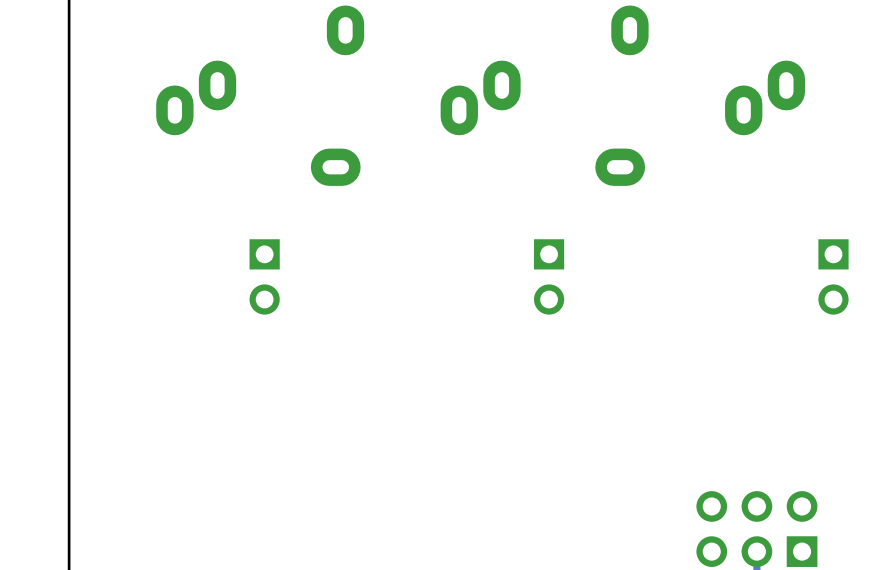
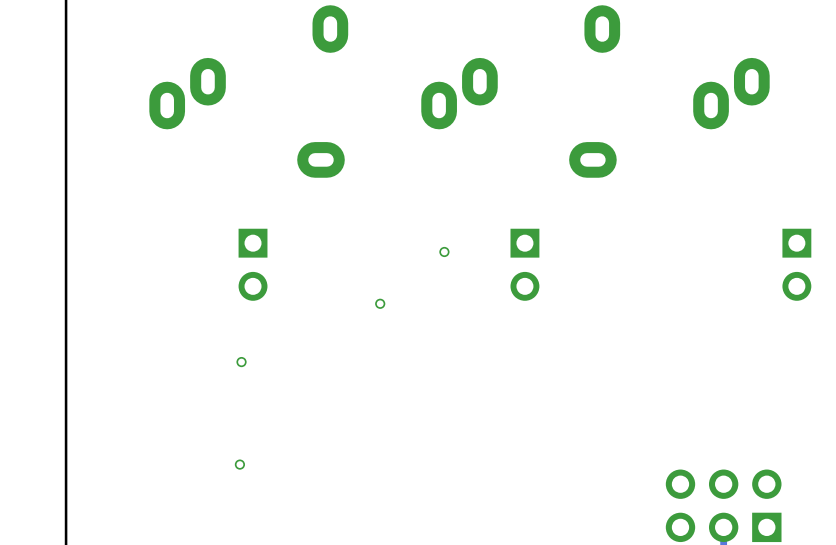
via: none -> (444, 251)
via: none -> (380, 303)
via: none -> (241, 362)
via: none -> (239, 464)

